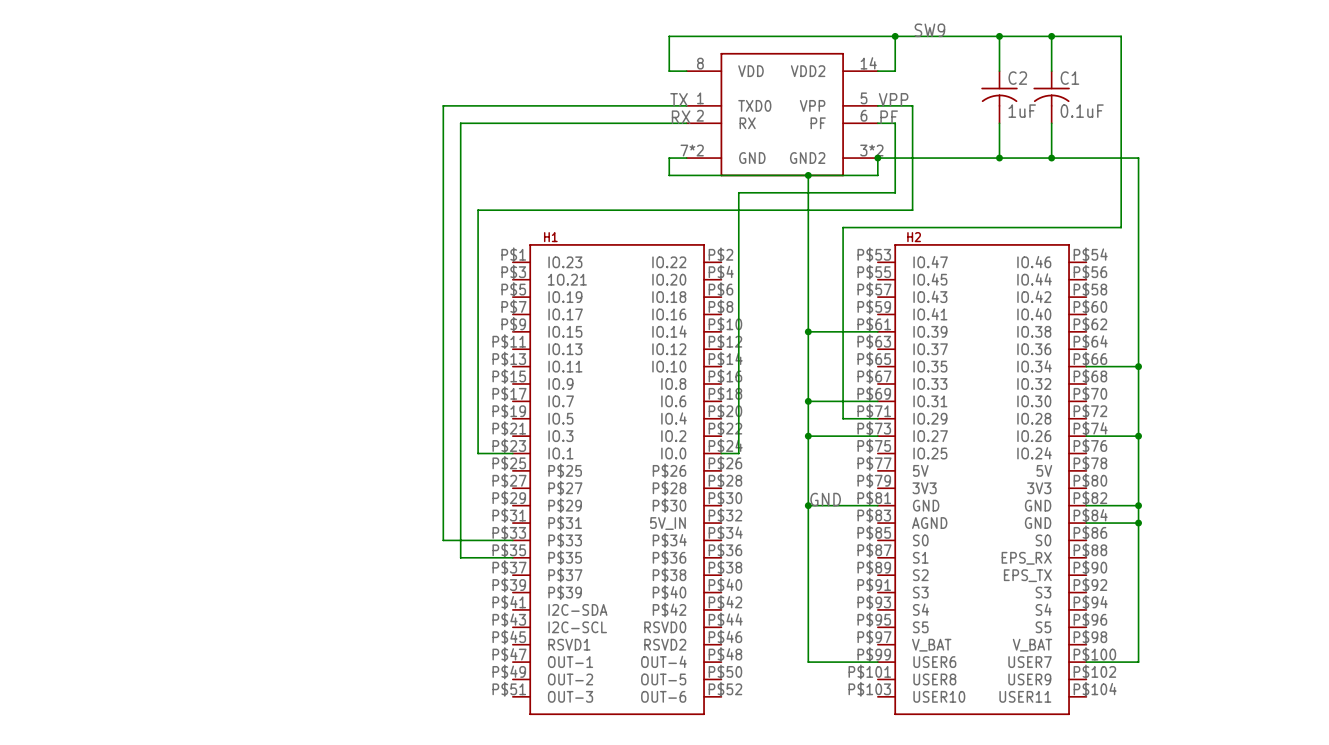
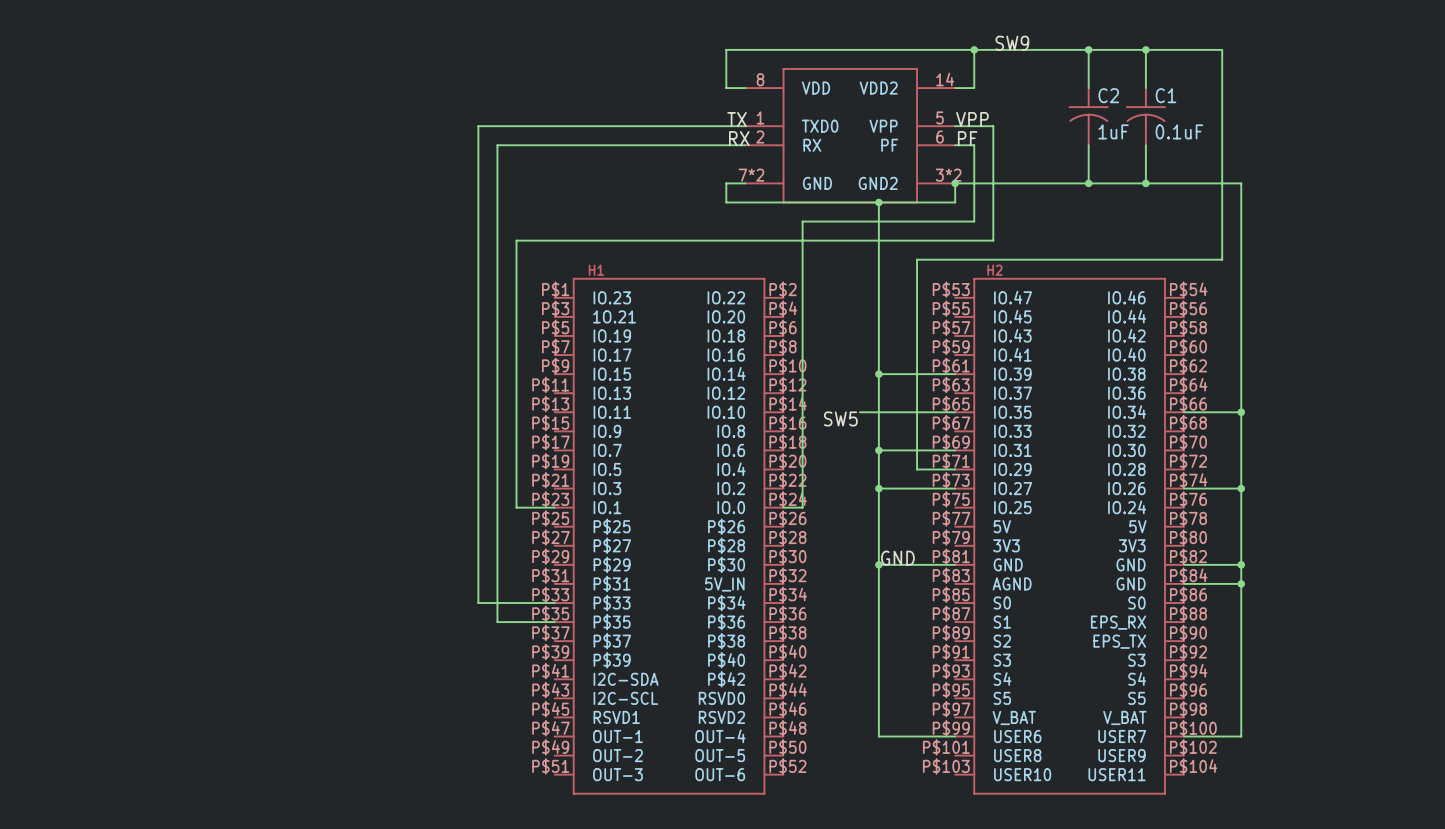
wire: none -> (859, 412) (955, 412)
label: none -> SW5 (840, 418)

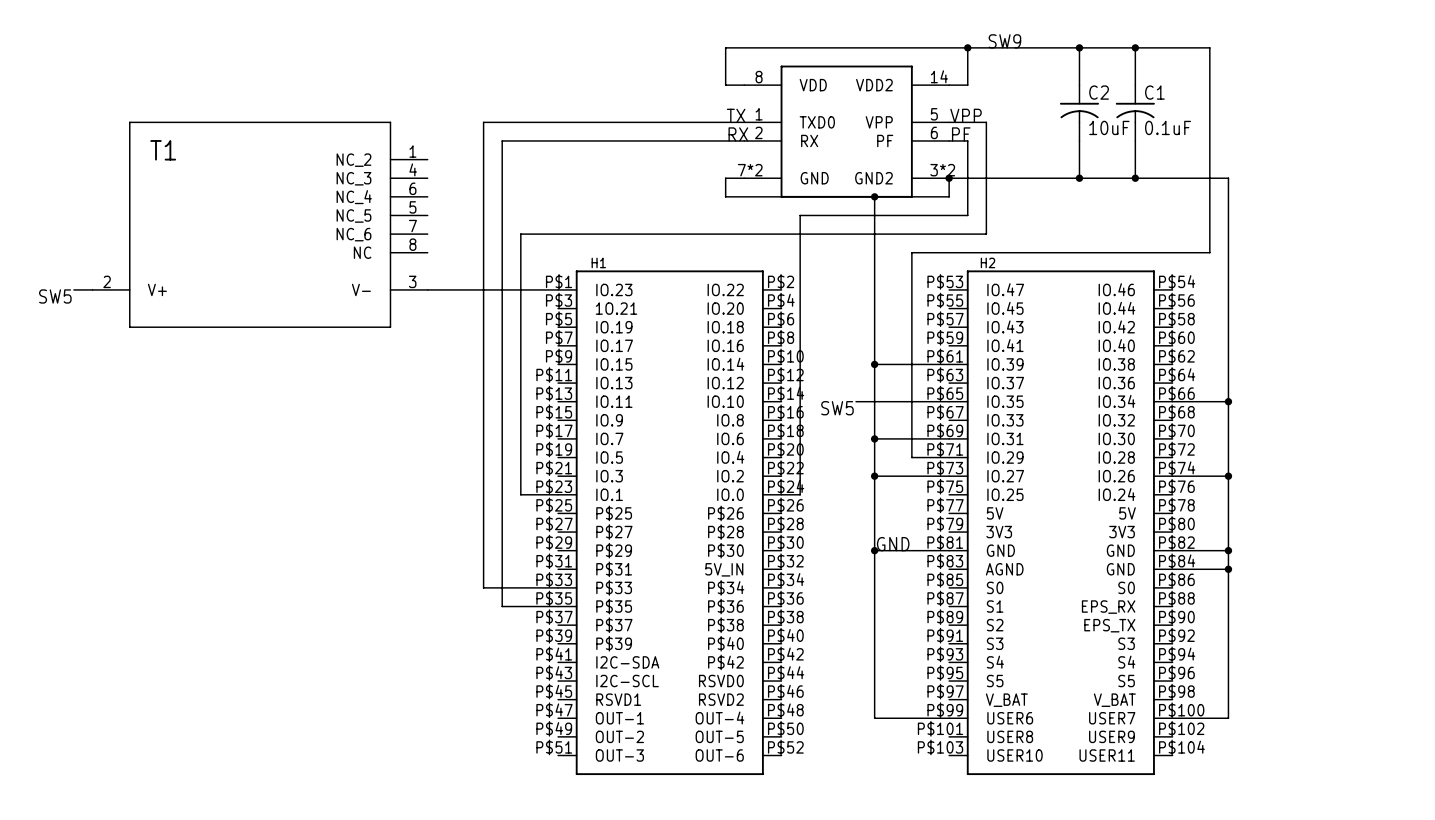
C2 value: 1uF (1113, 131) -> 10uF (1109, 127)
T1: none -> (260, 224)
wire: none -> (73, 289) (92, 289)
wire: none -> (427, 289) (558, 289)
label: none -> SW5 (55, 296)

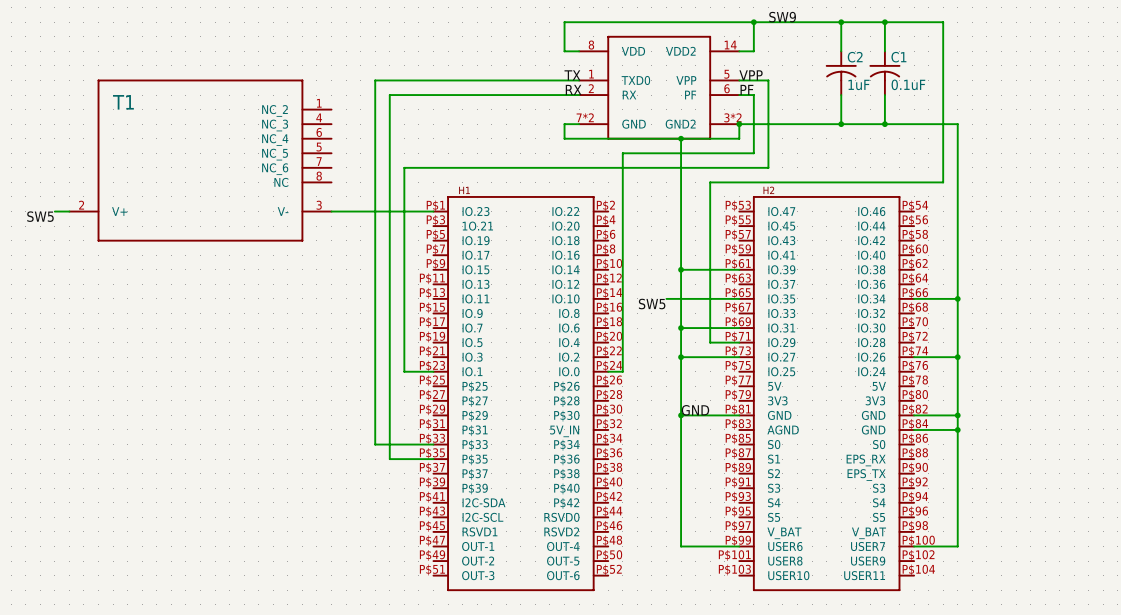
C2 value: 10uF (1109, 127) -> 1uF (859, 84)

